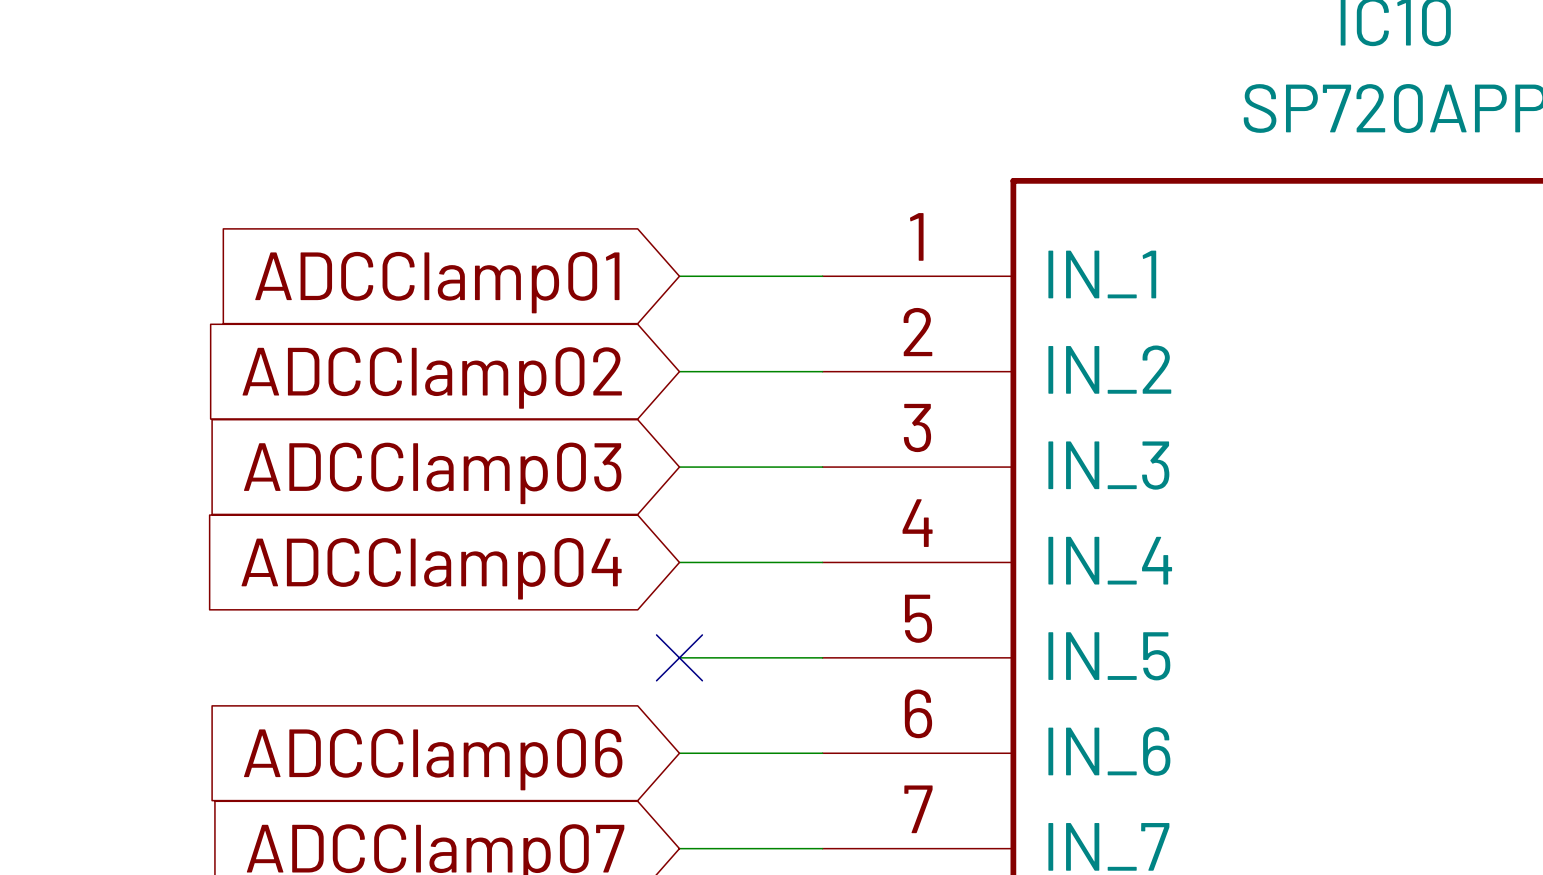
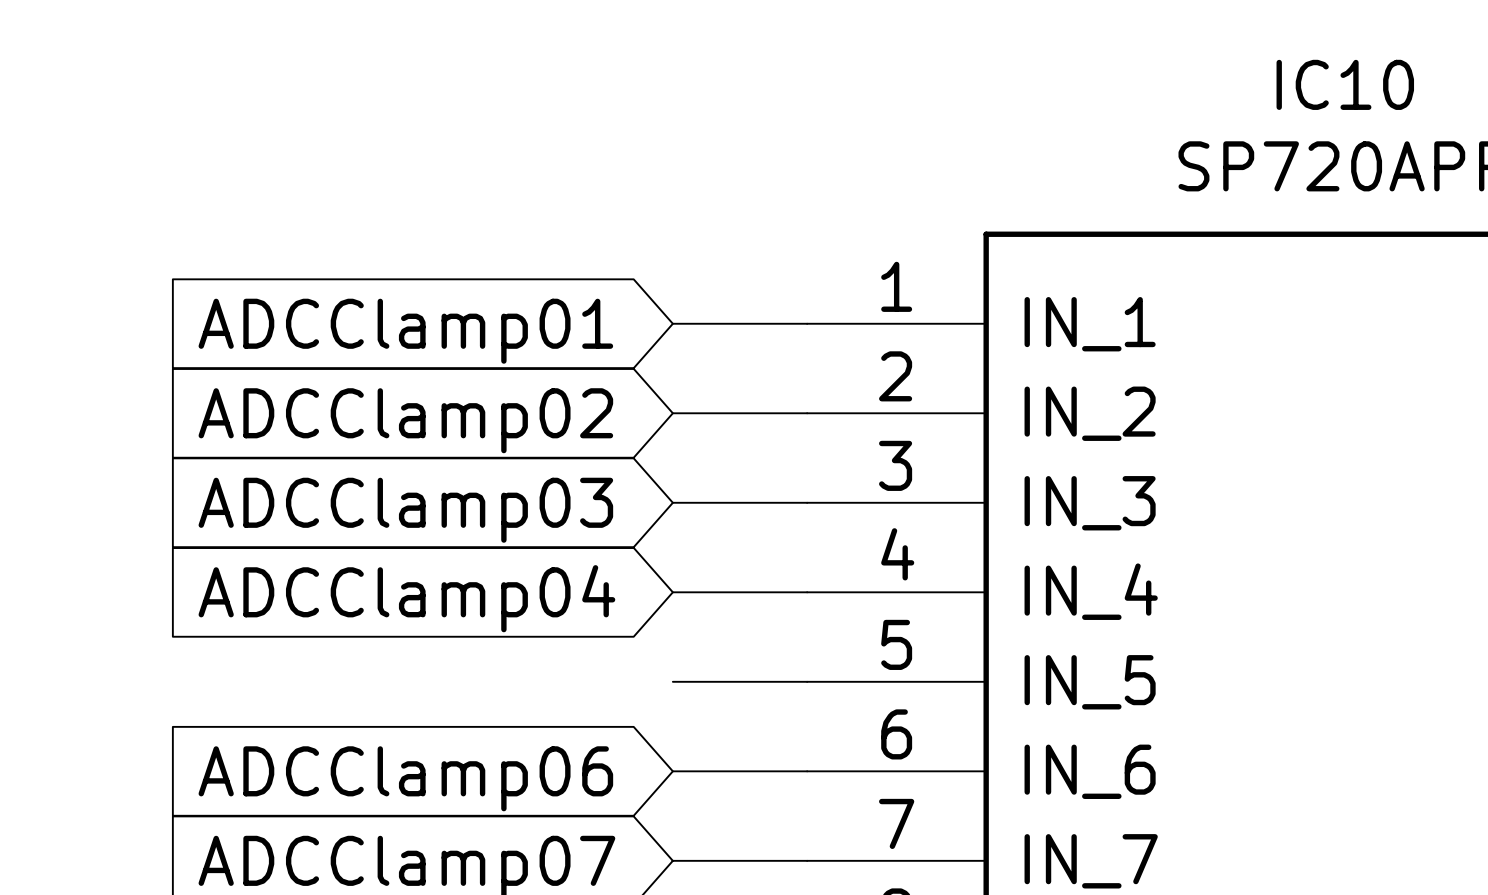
no-connect mark: (679, 657) -> none

